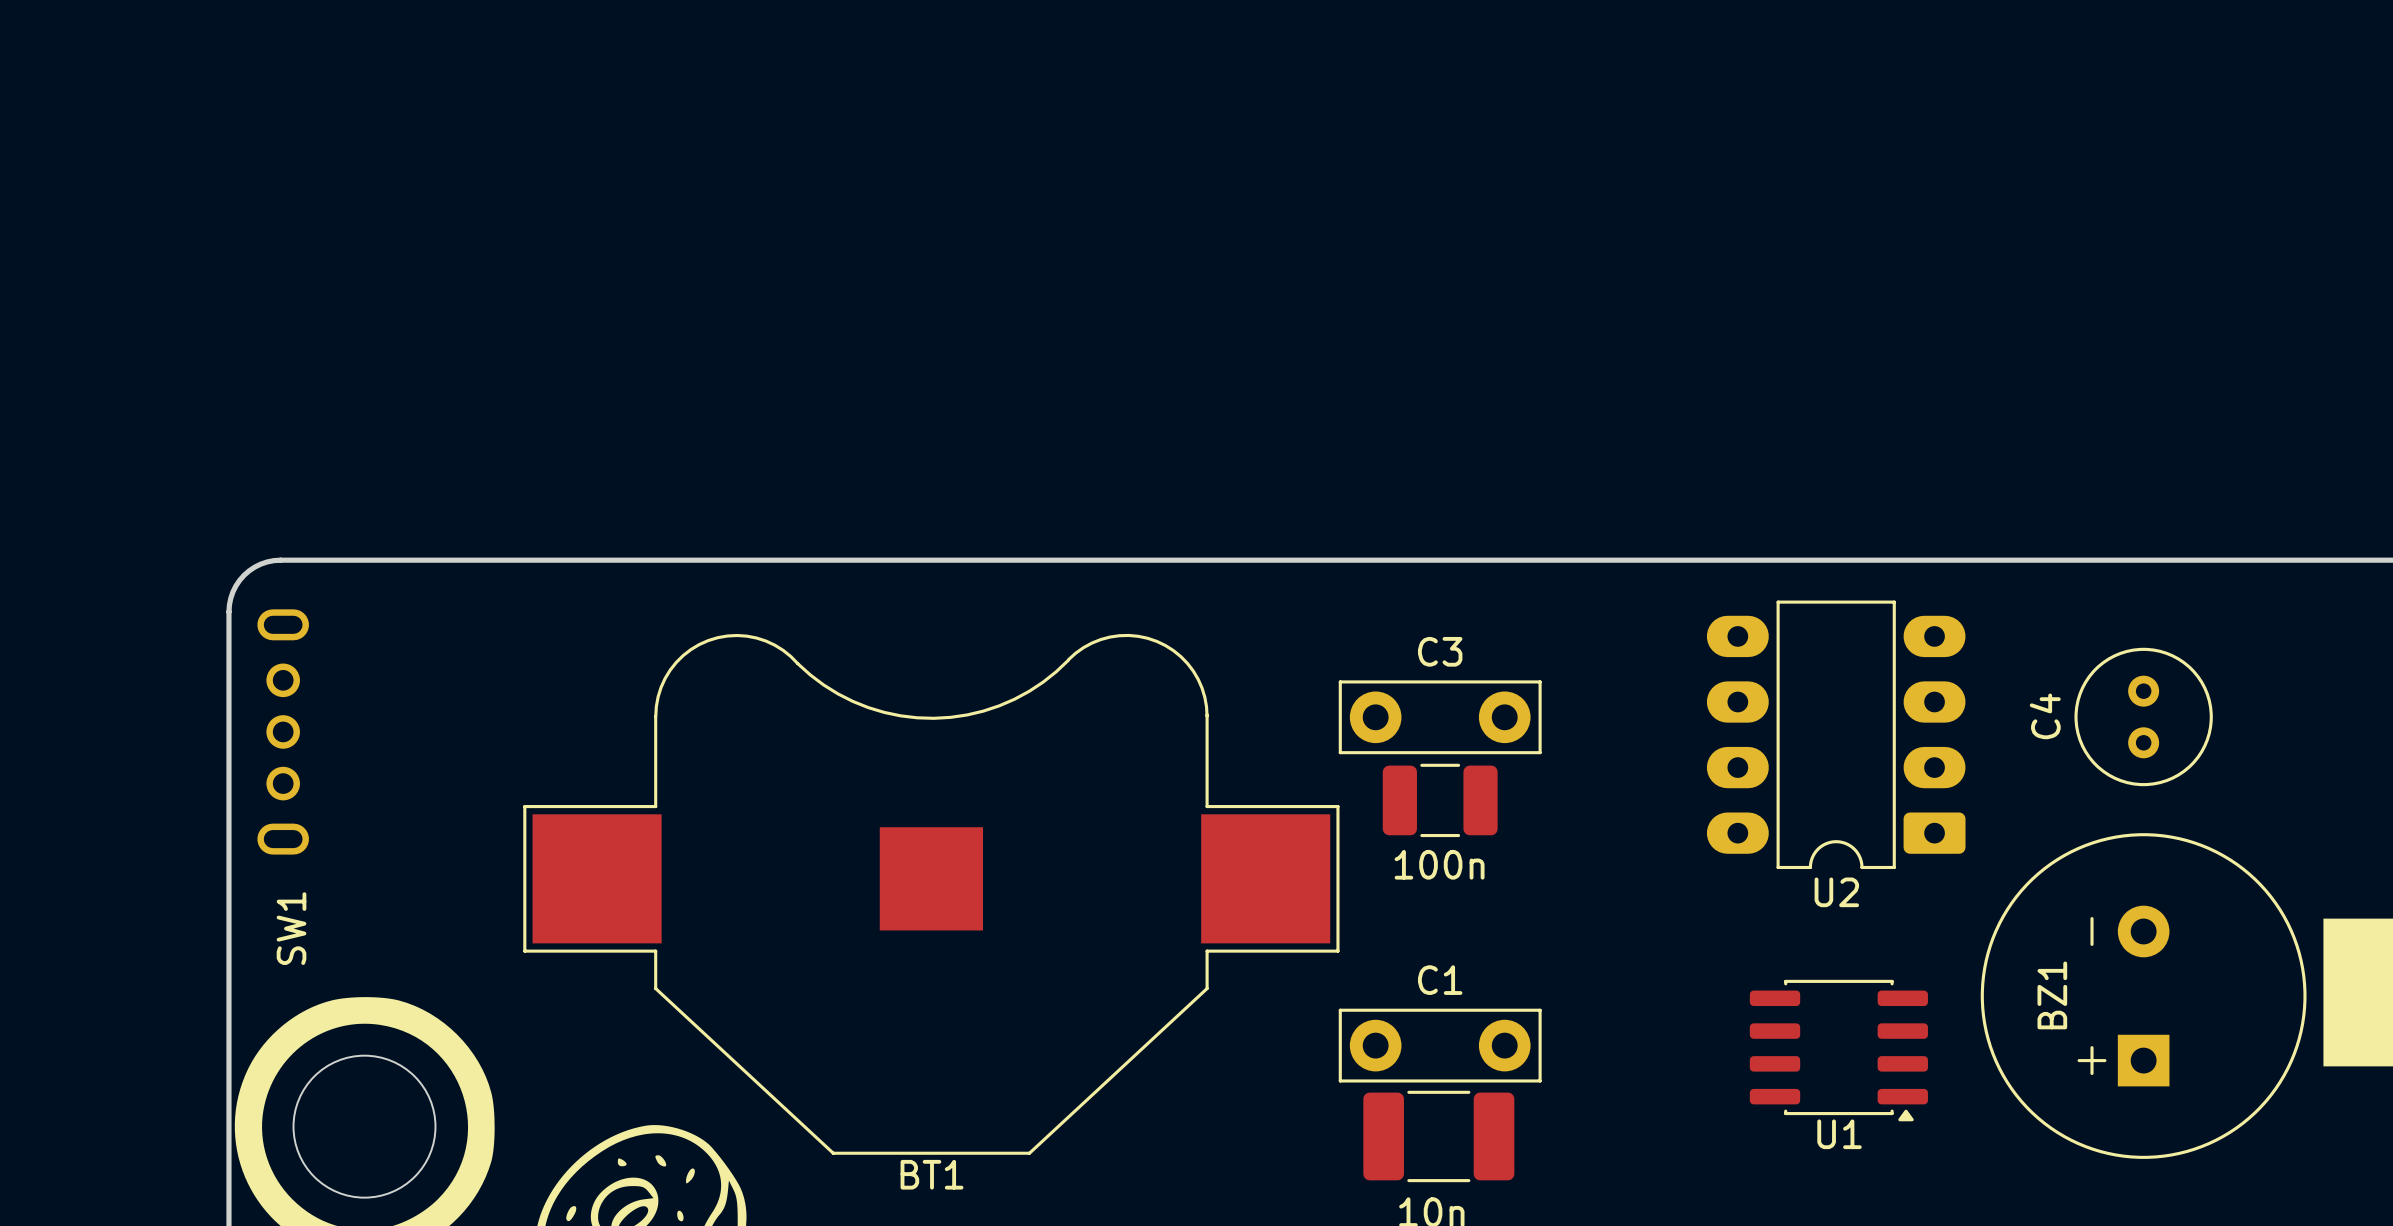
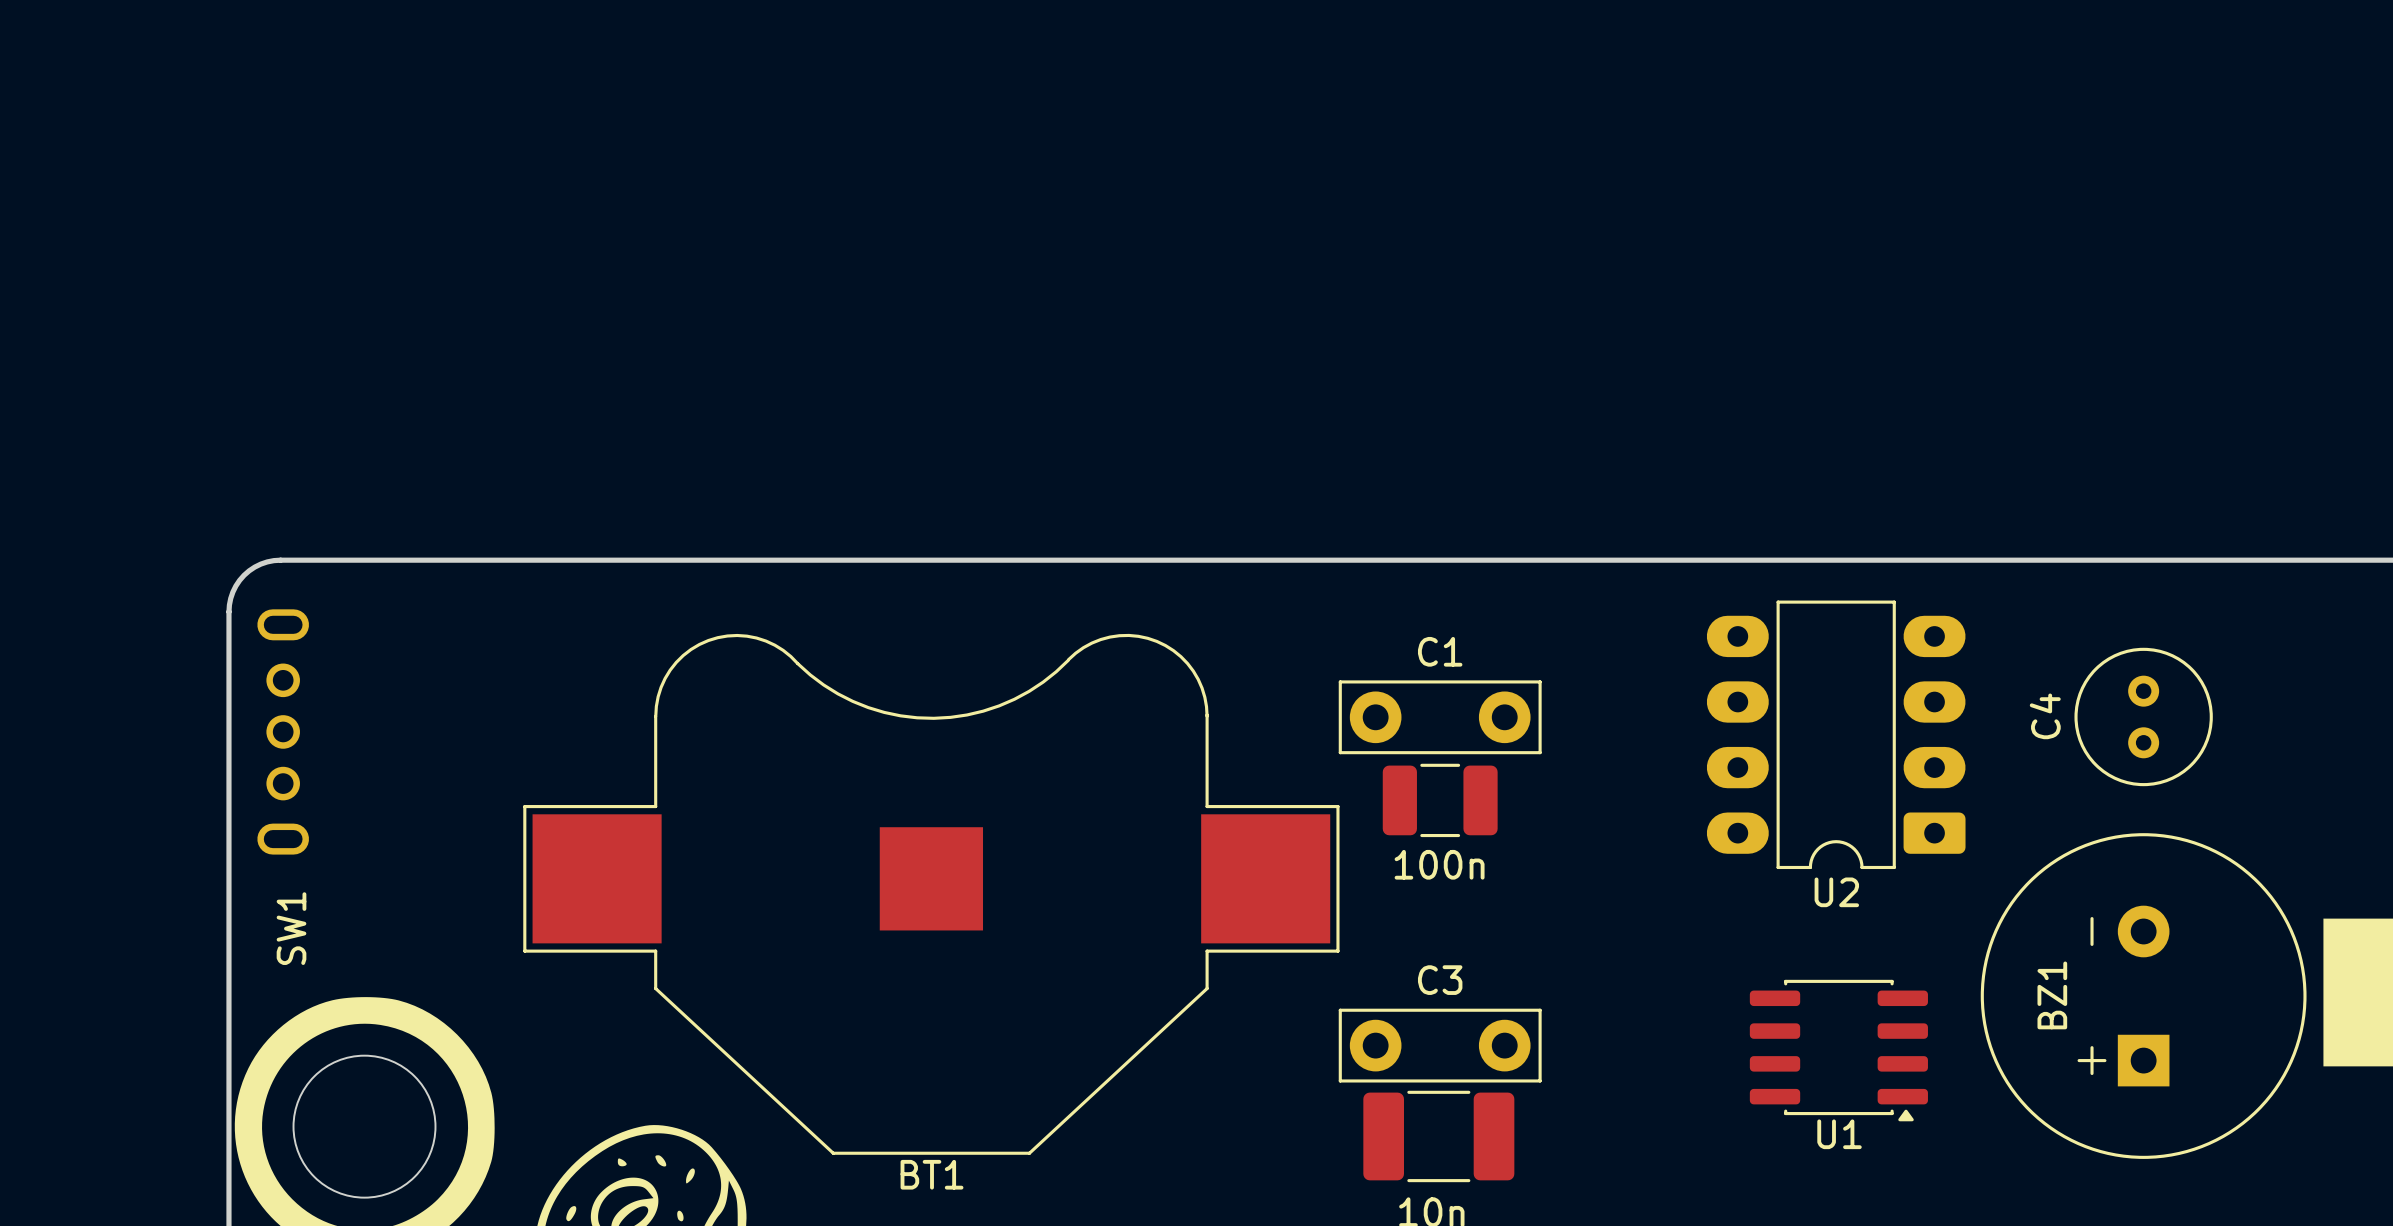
C3 name: C3 (1440, 651) -> C1 (1440, 651)
C1 name: C1 (1440, 980) -> C3 (1440, 980)

